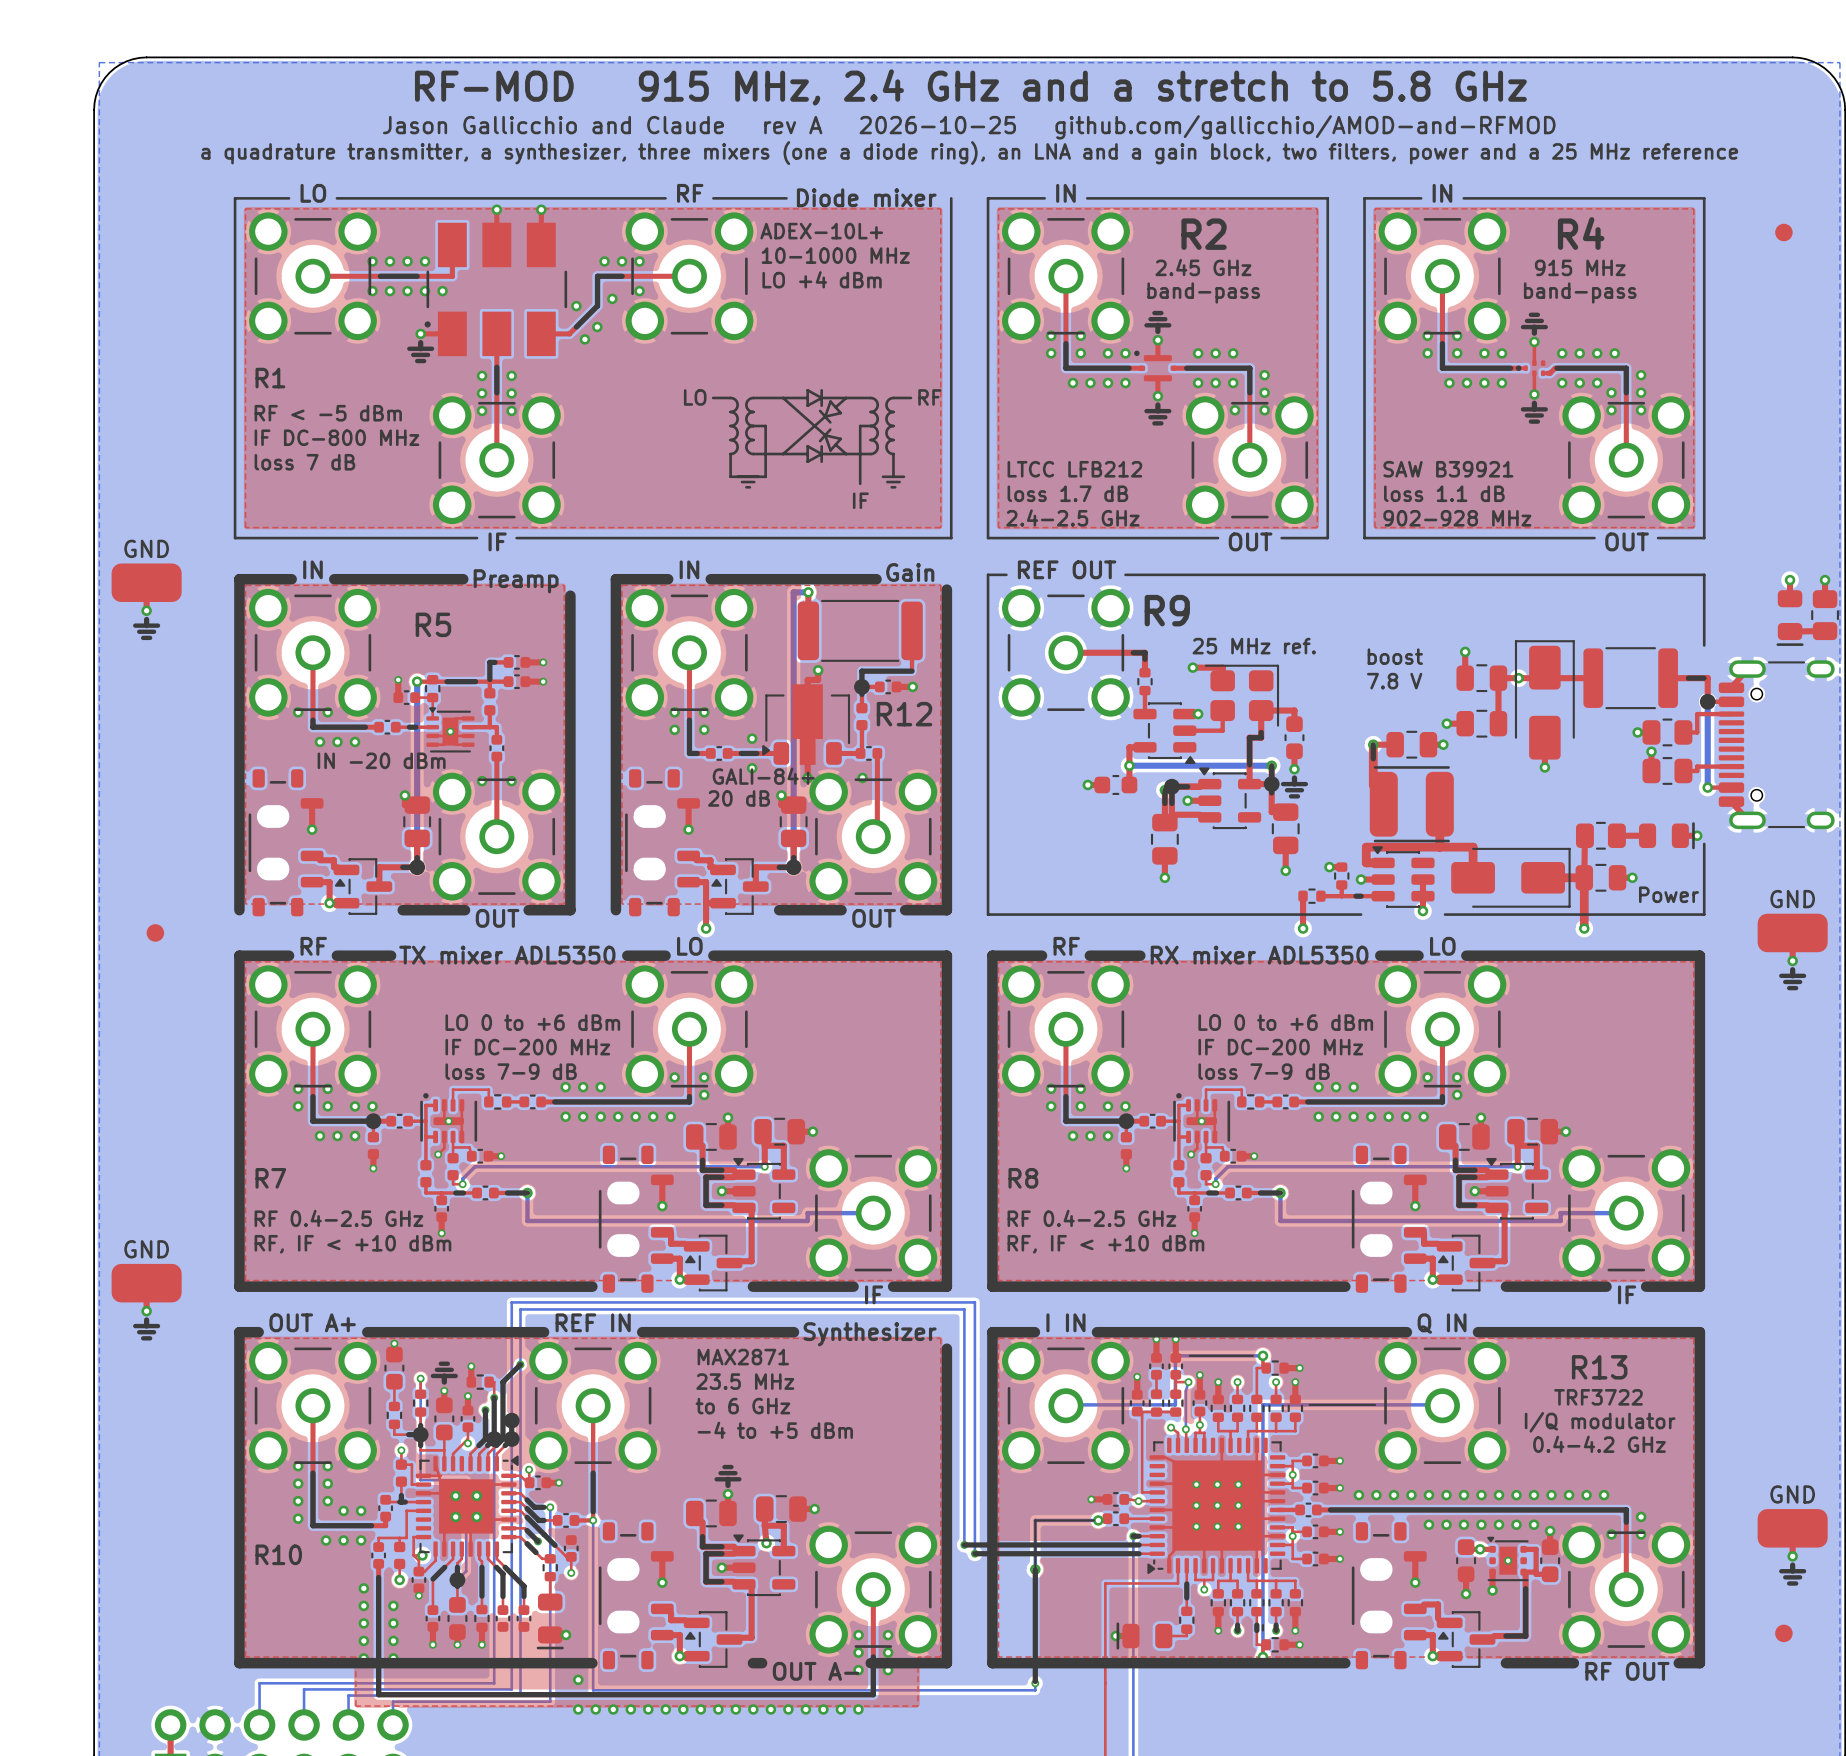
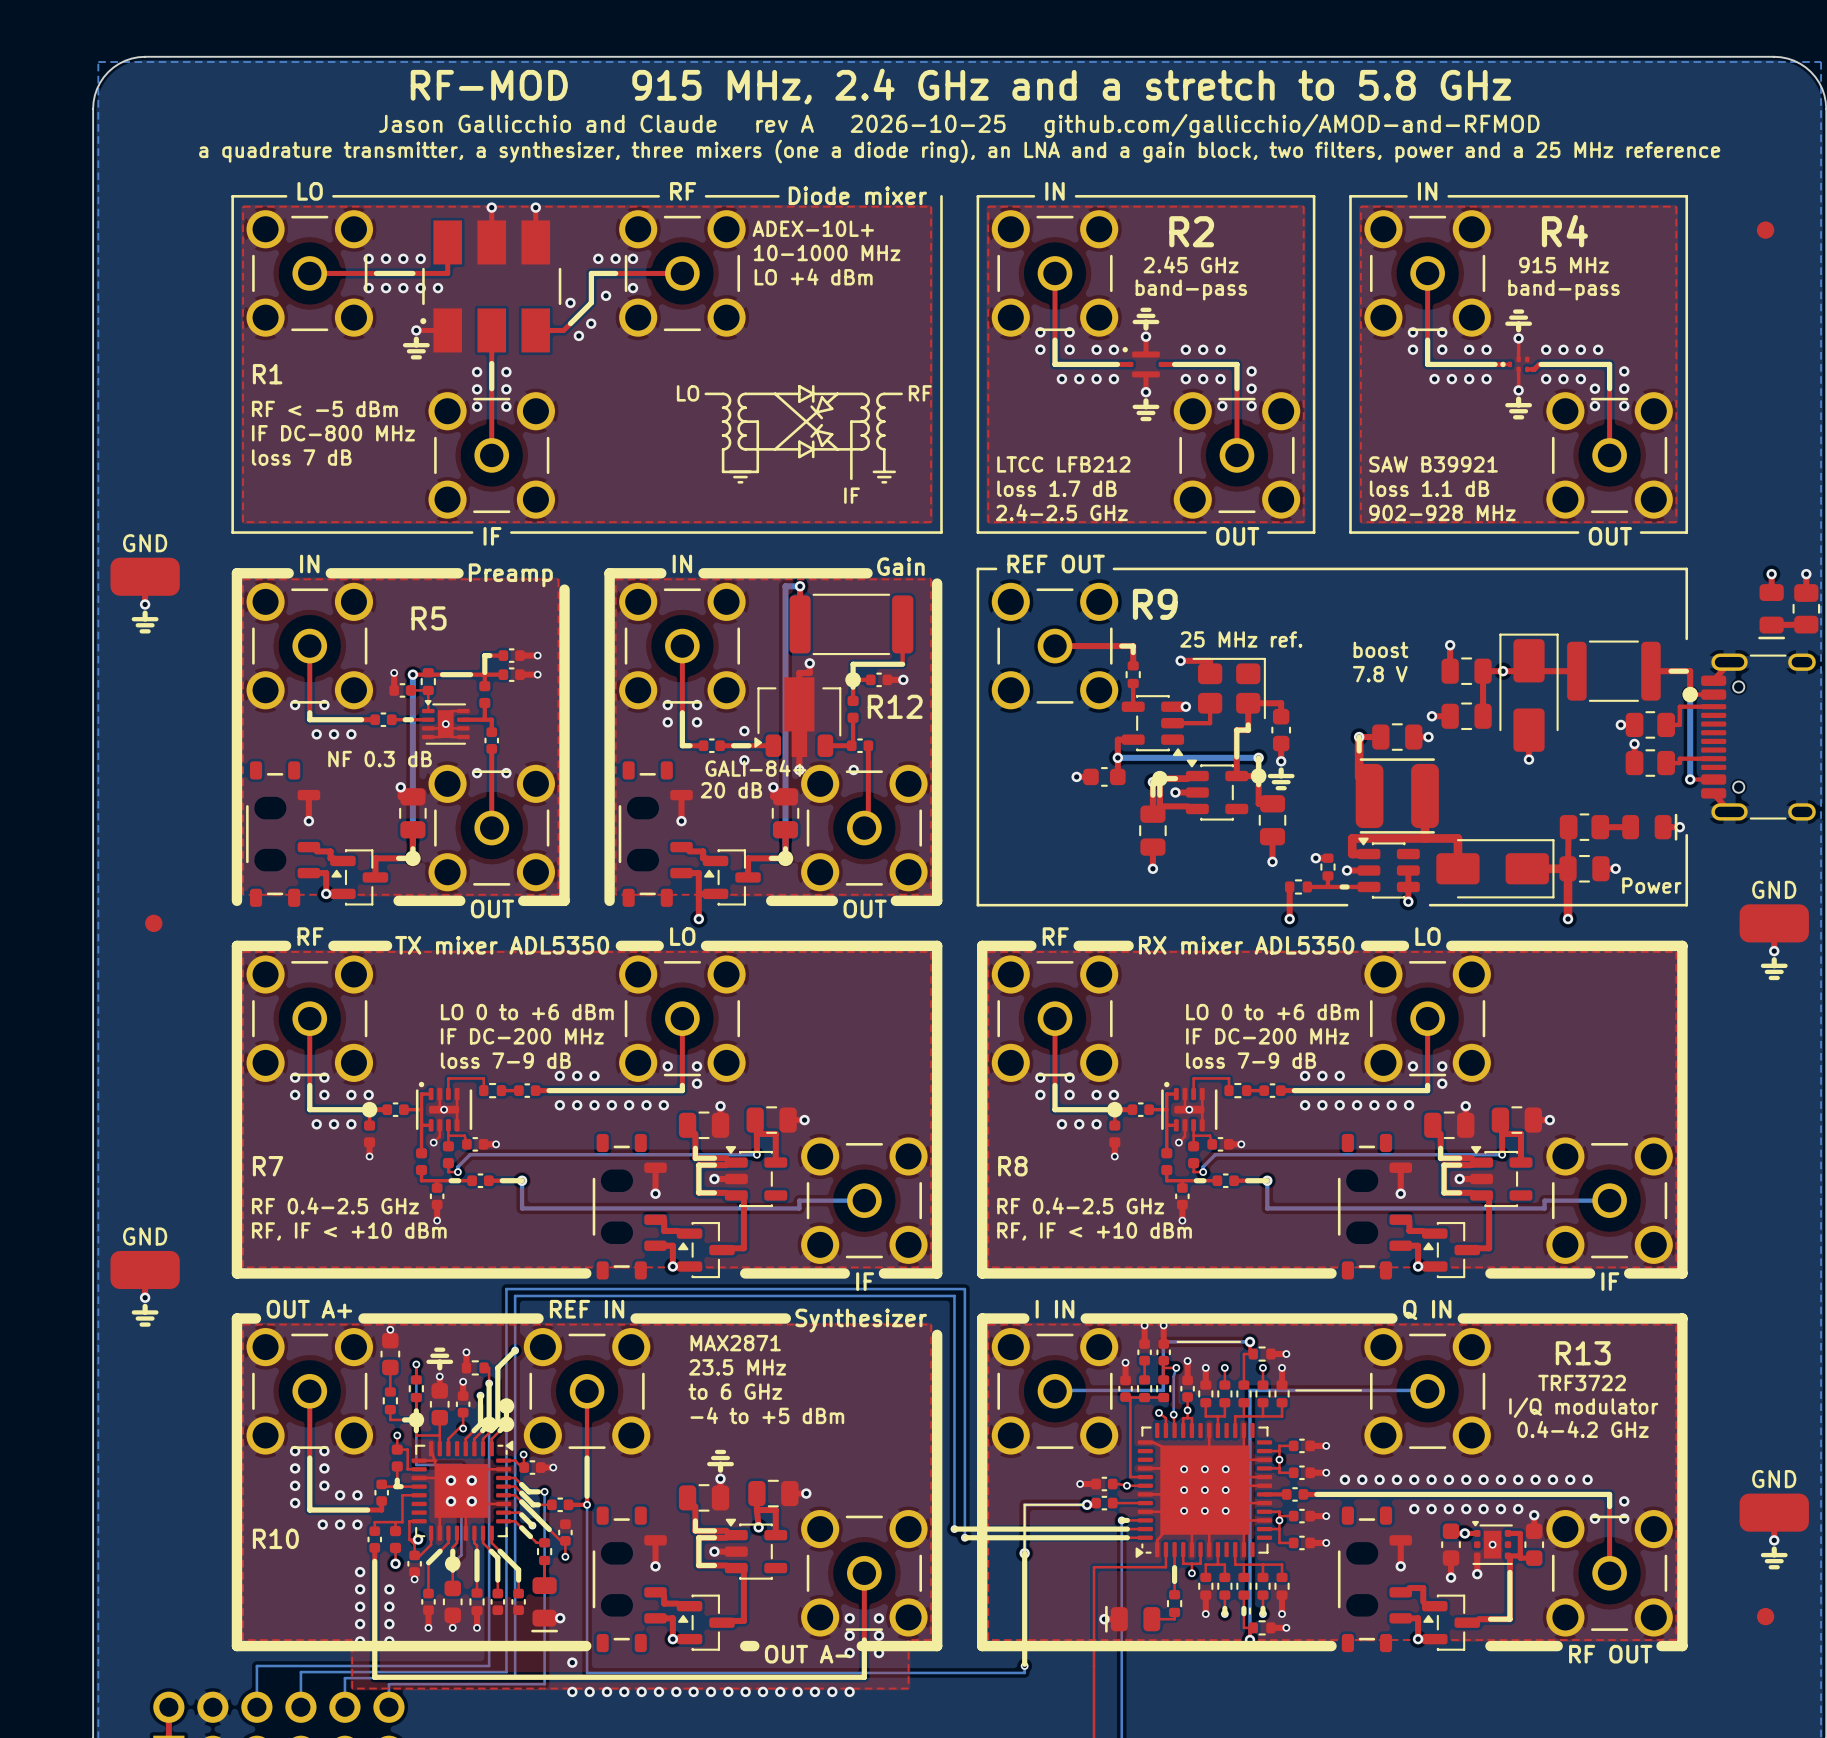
text: IN -20 dBm (381, 760) -> NF 0.3 dB (380, 759)

